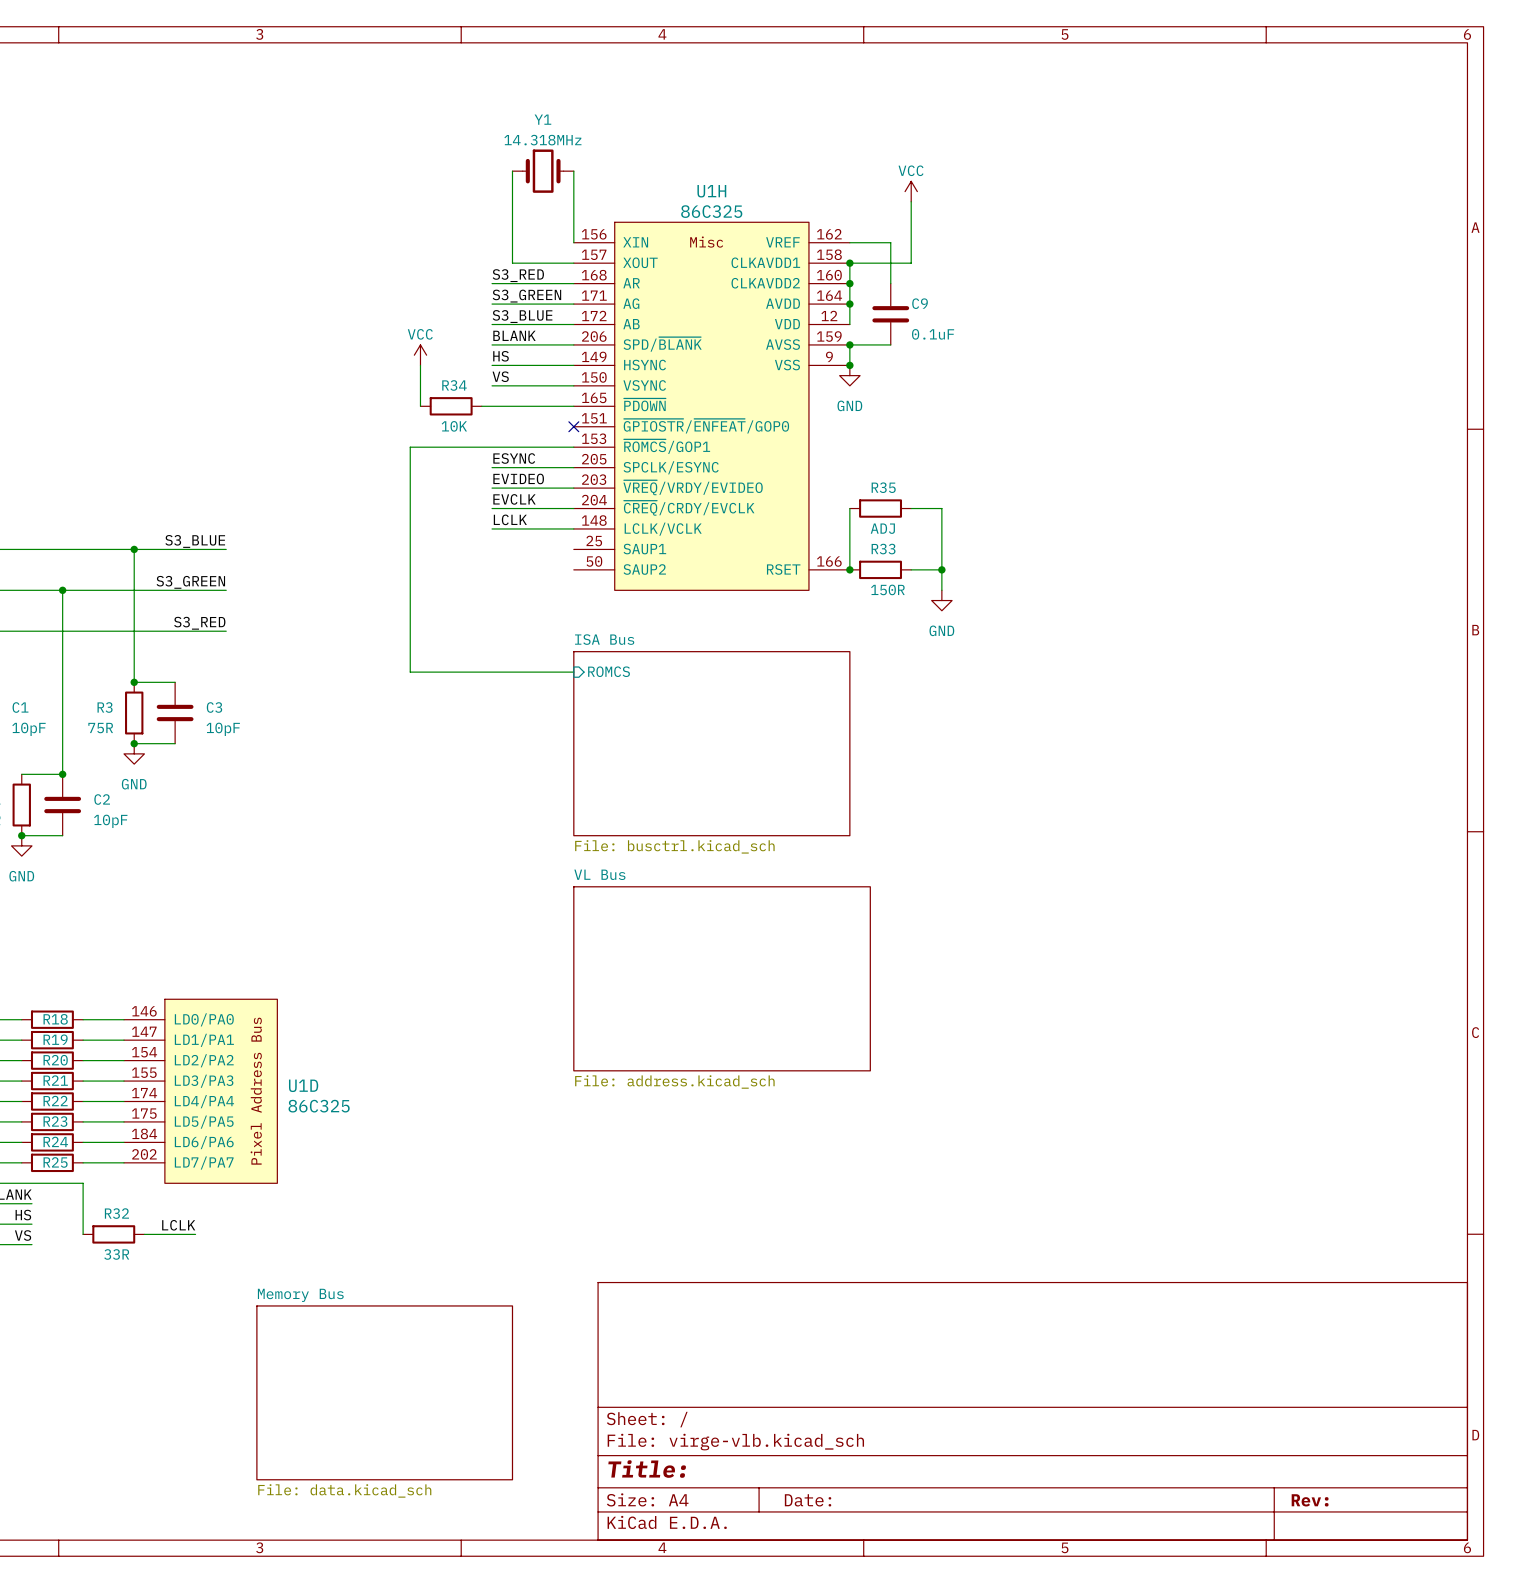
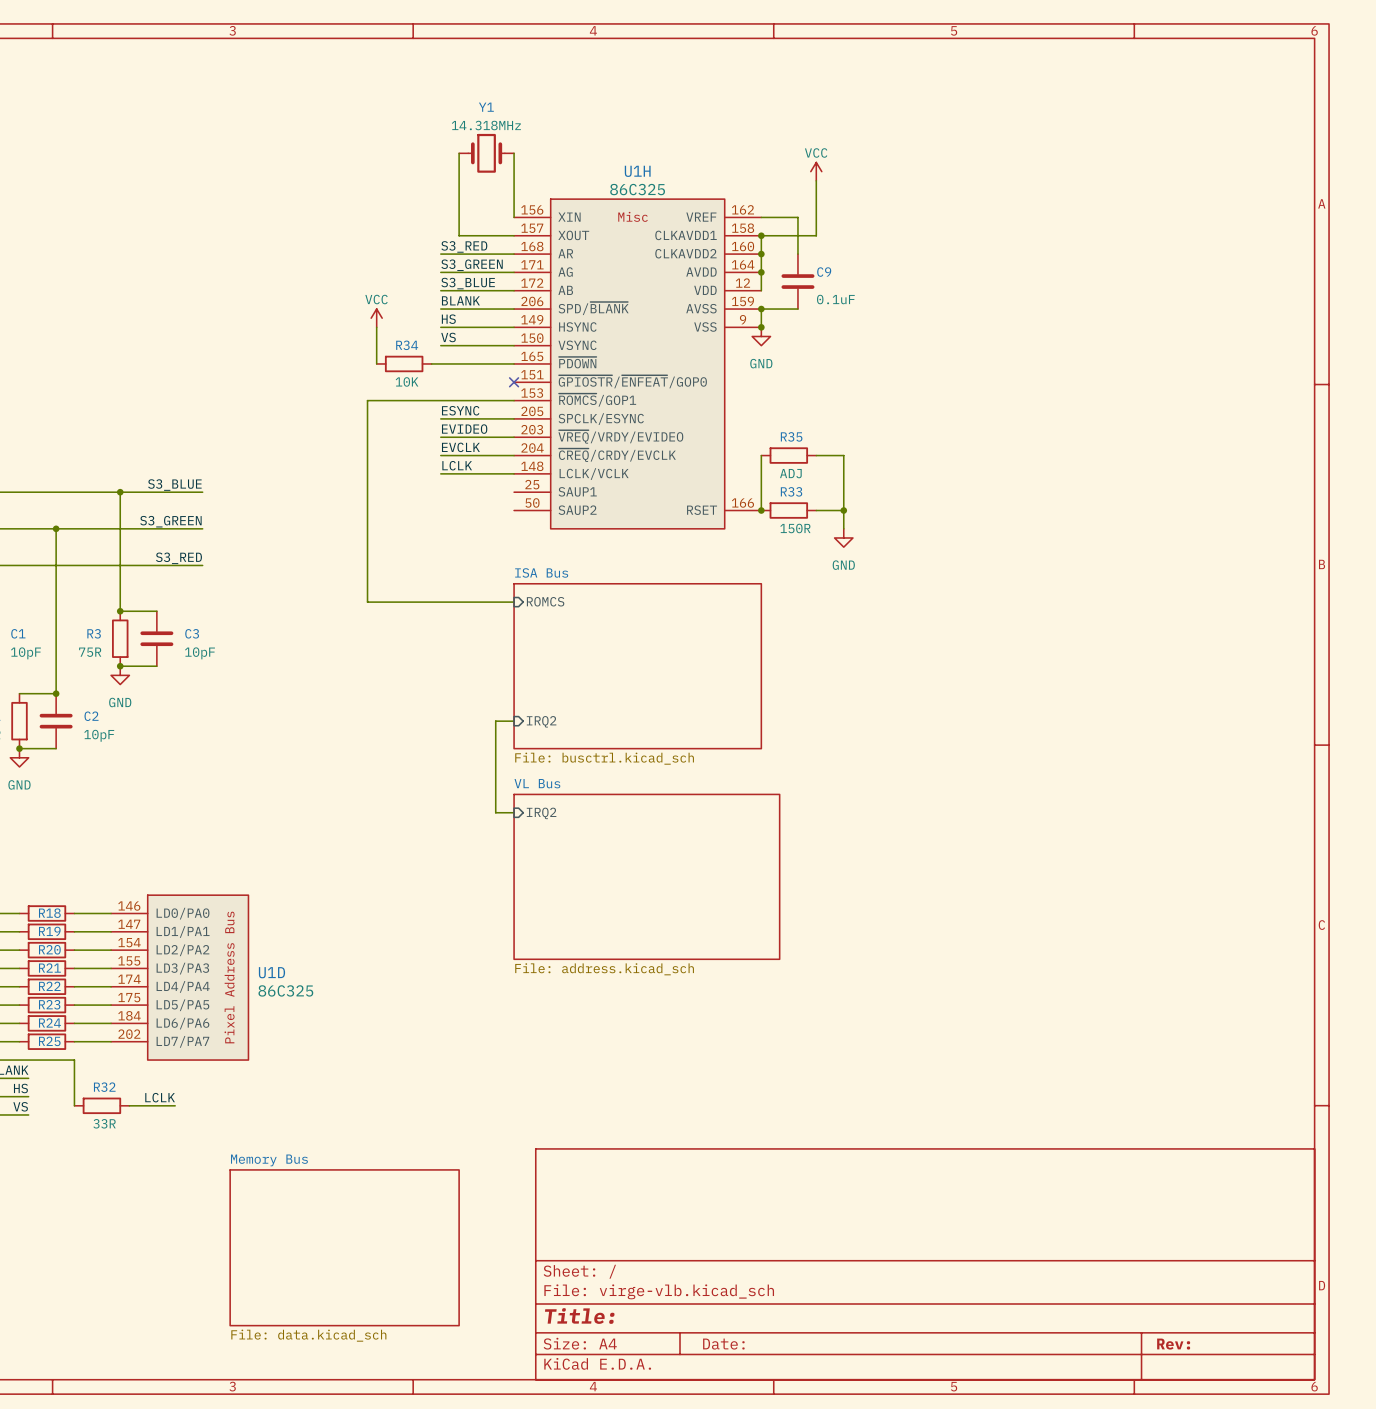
wire: none -> (514, 721) (495, 721) (495, 812) (514, 812)
sheet pin: none -> IRQ2 (541, 721)
sheet pin: none -> IRQ2 (541, 813)

